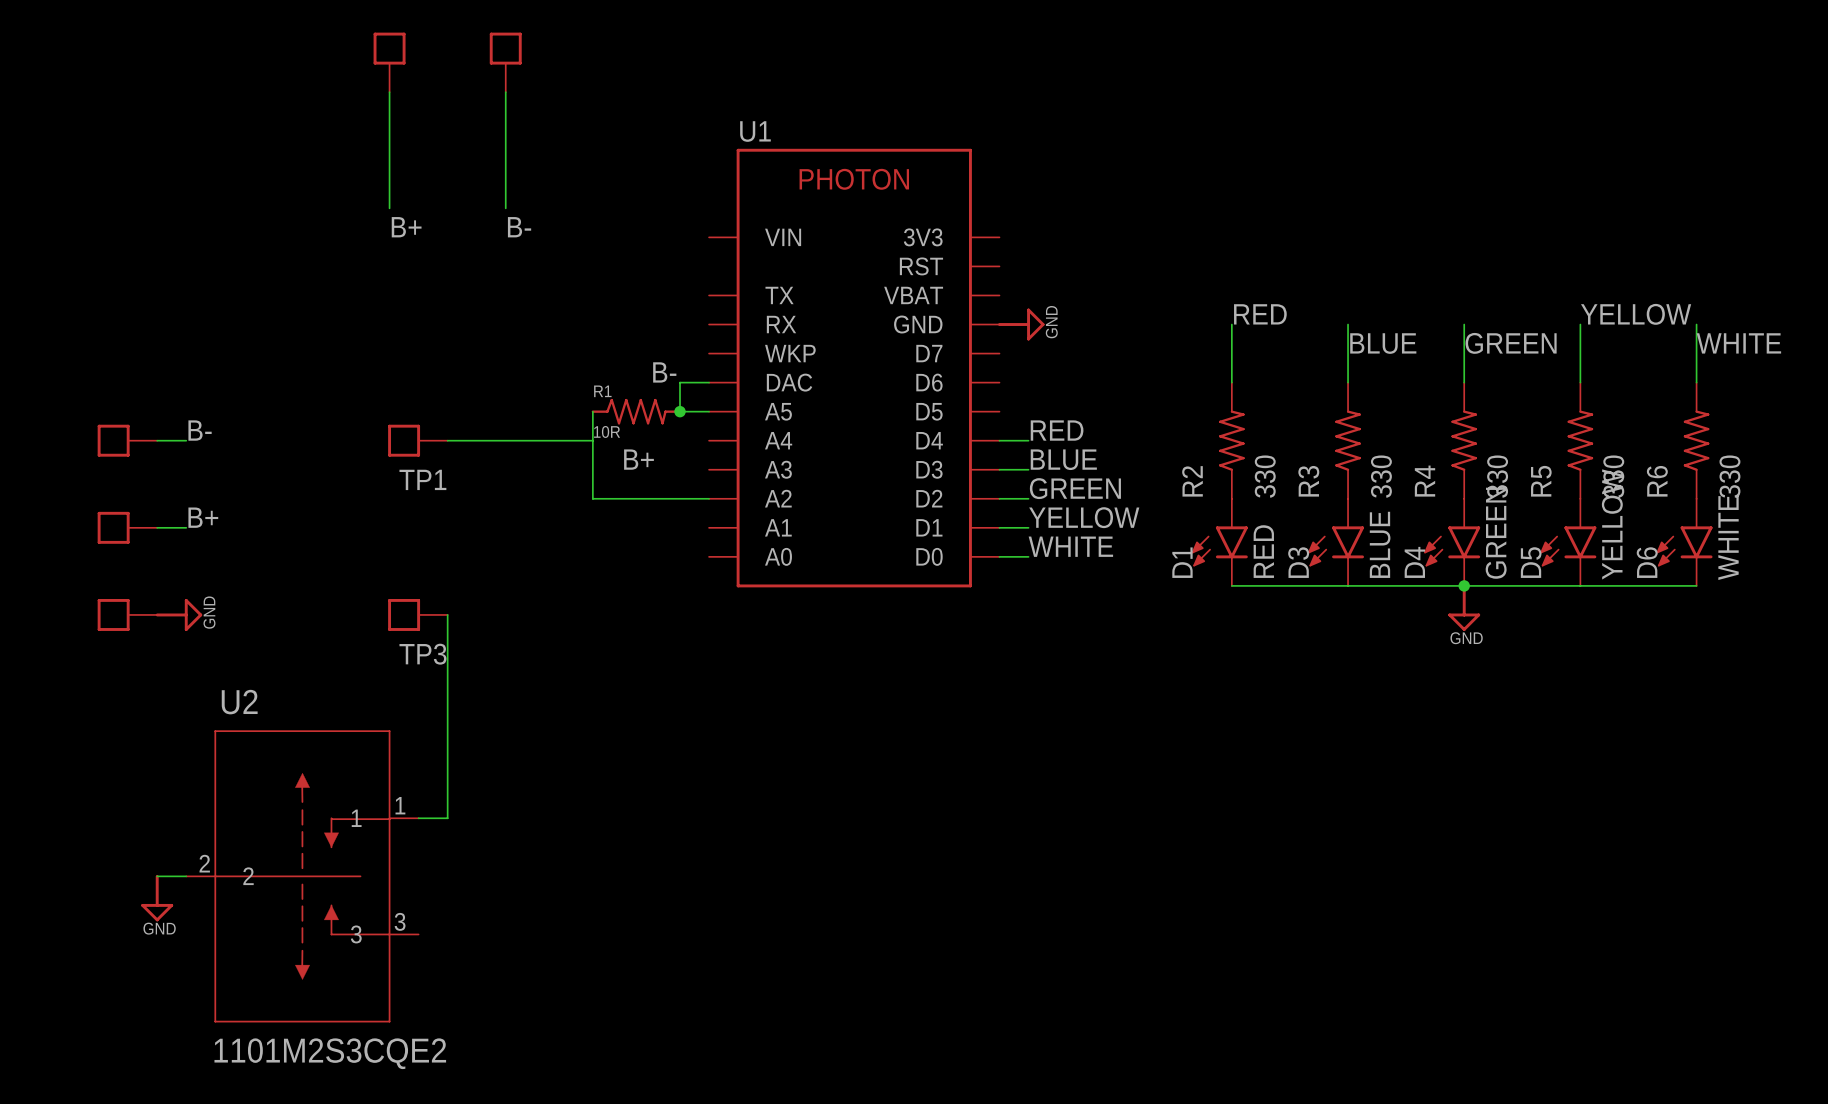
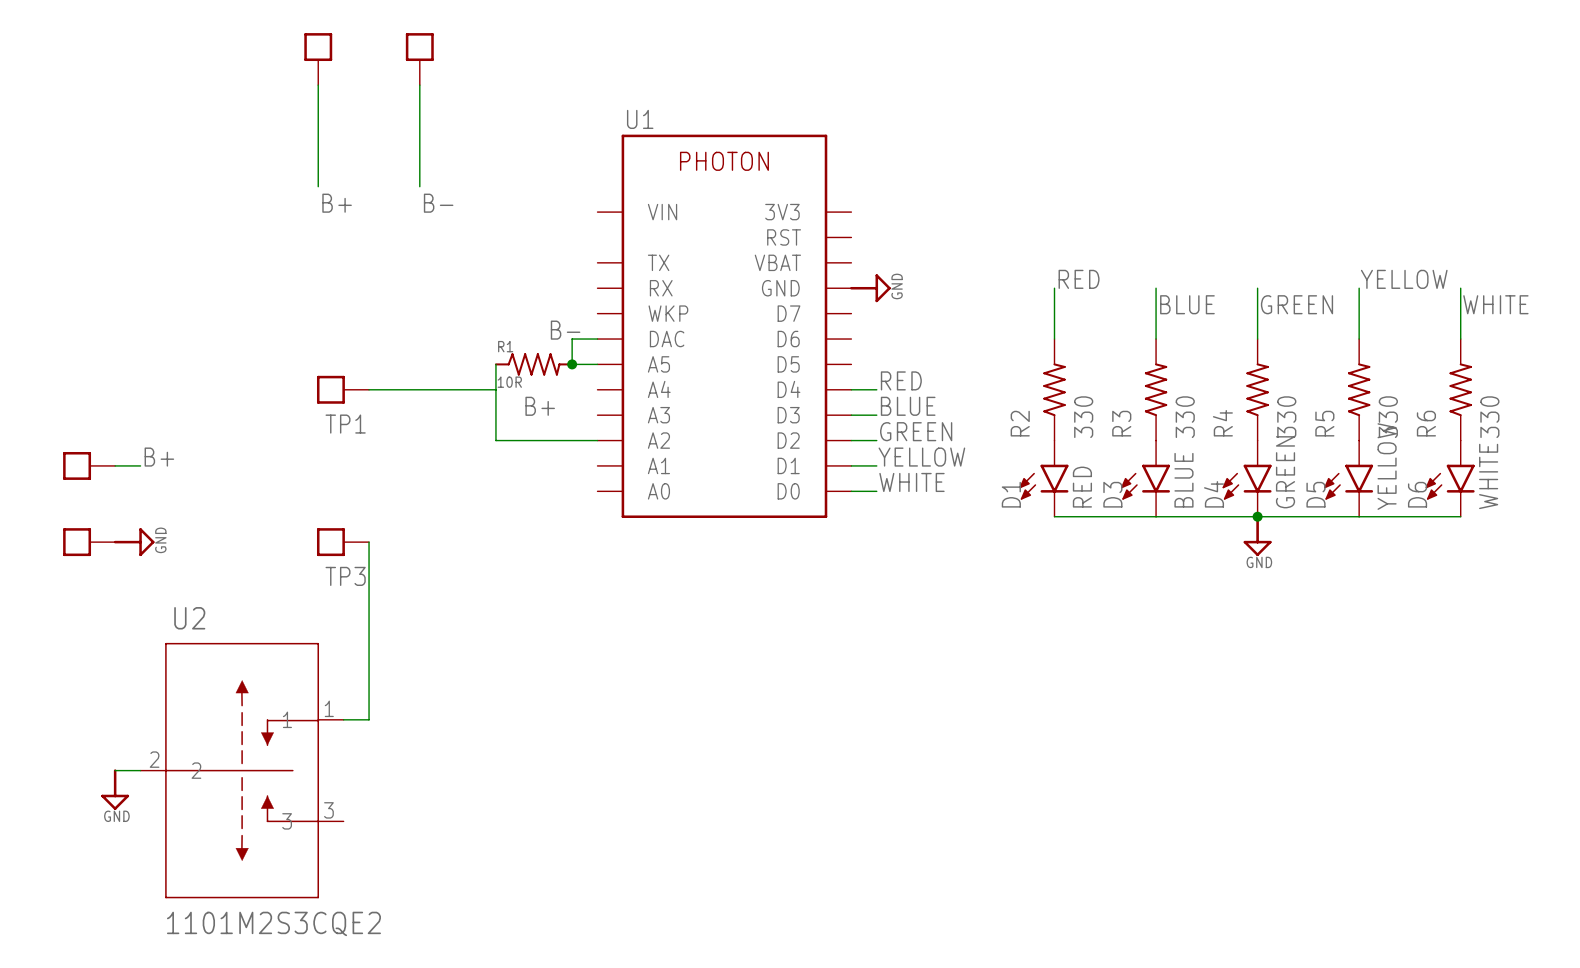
label: B- (200, 430) -> none
part: (127, 440) -> none
wire: (157, 440) (186, 440) -> none

